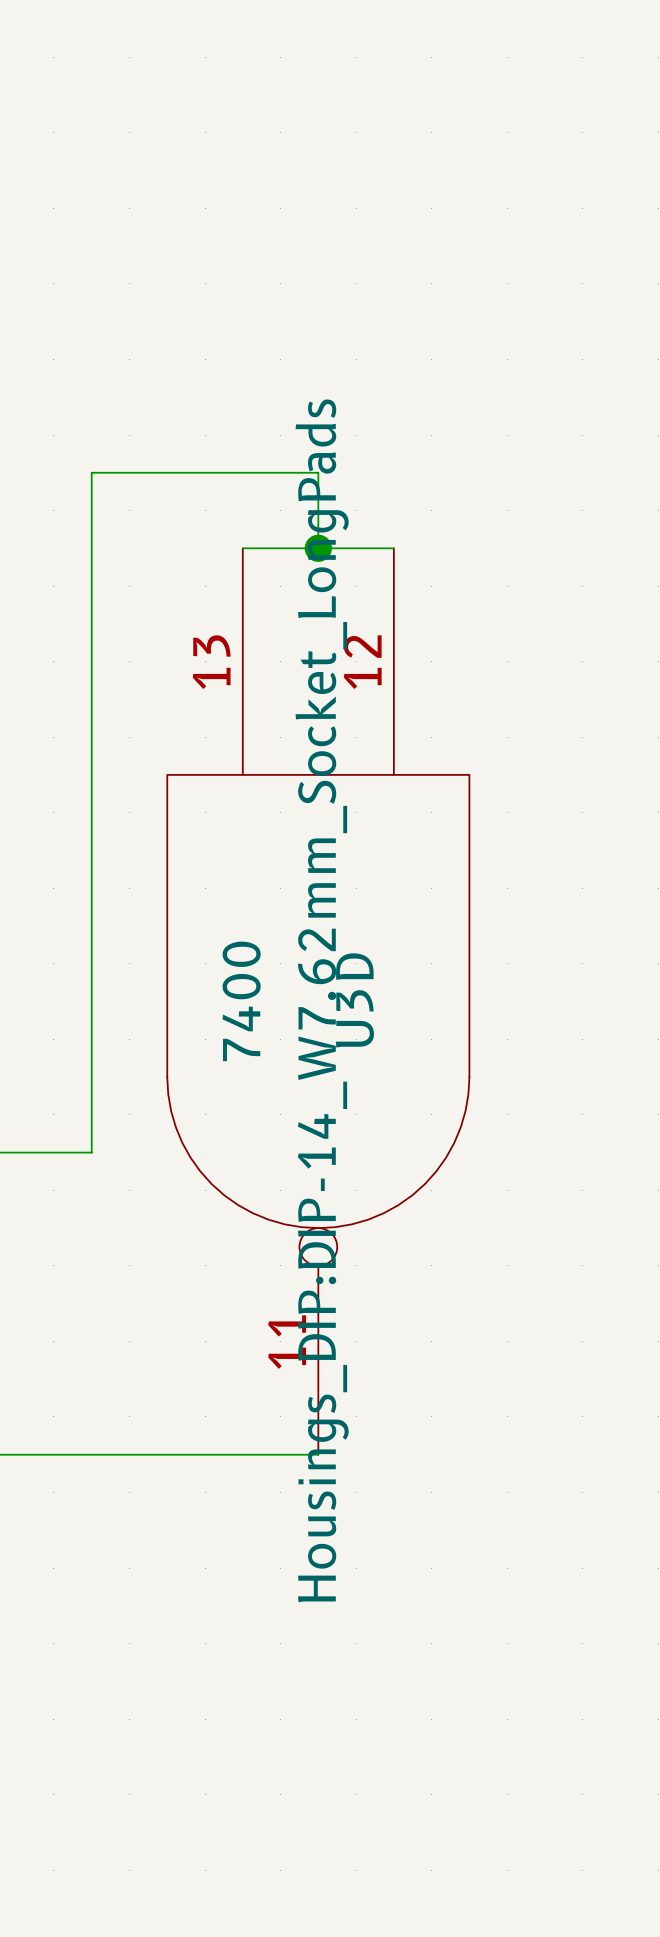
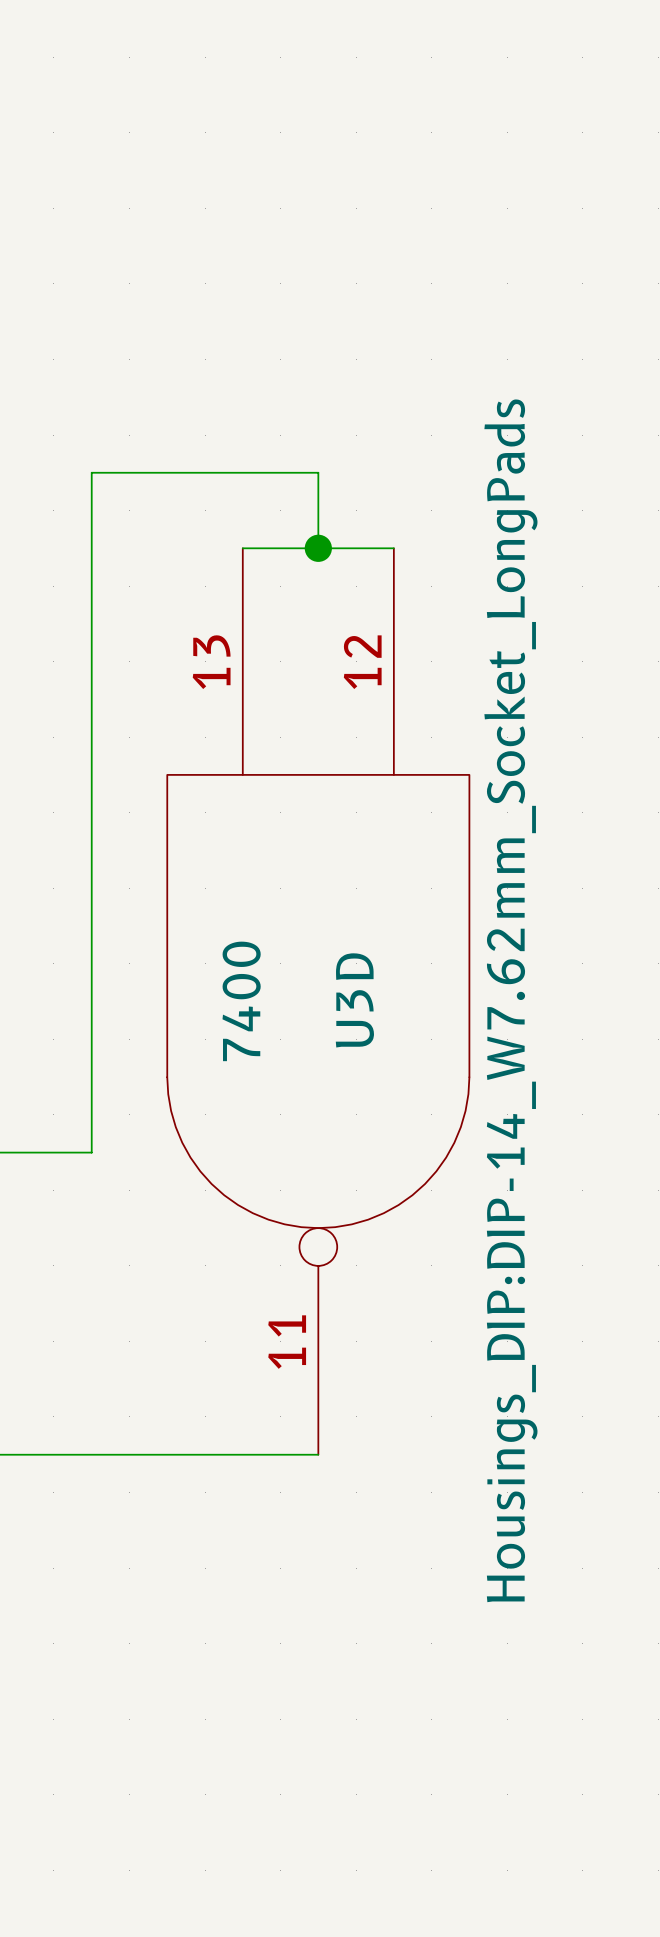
U3D text position: Housings_DIP:DIP-14_W7.62mm_Socket_LongPads (322, 1000) -> Housings_DIP:DIP-14_W7.62mm_Socket_LongPads (510, 1000)

